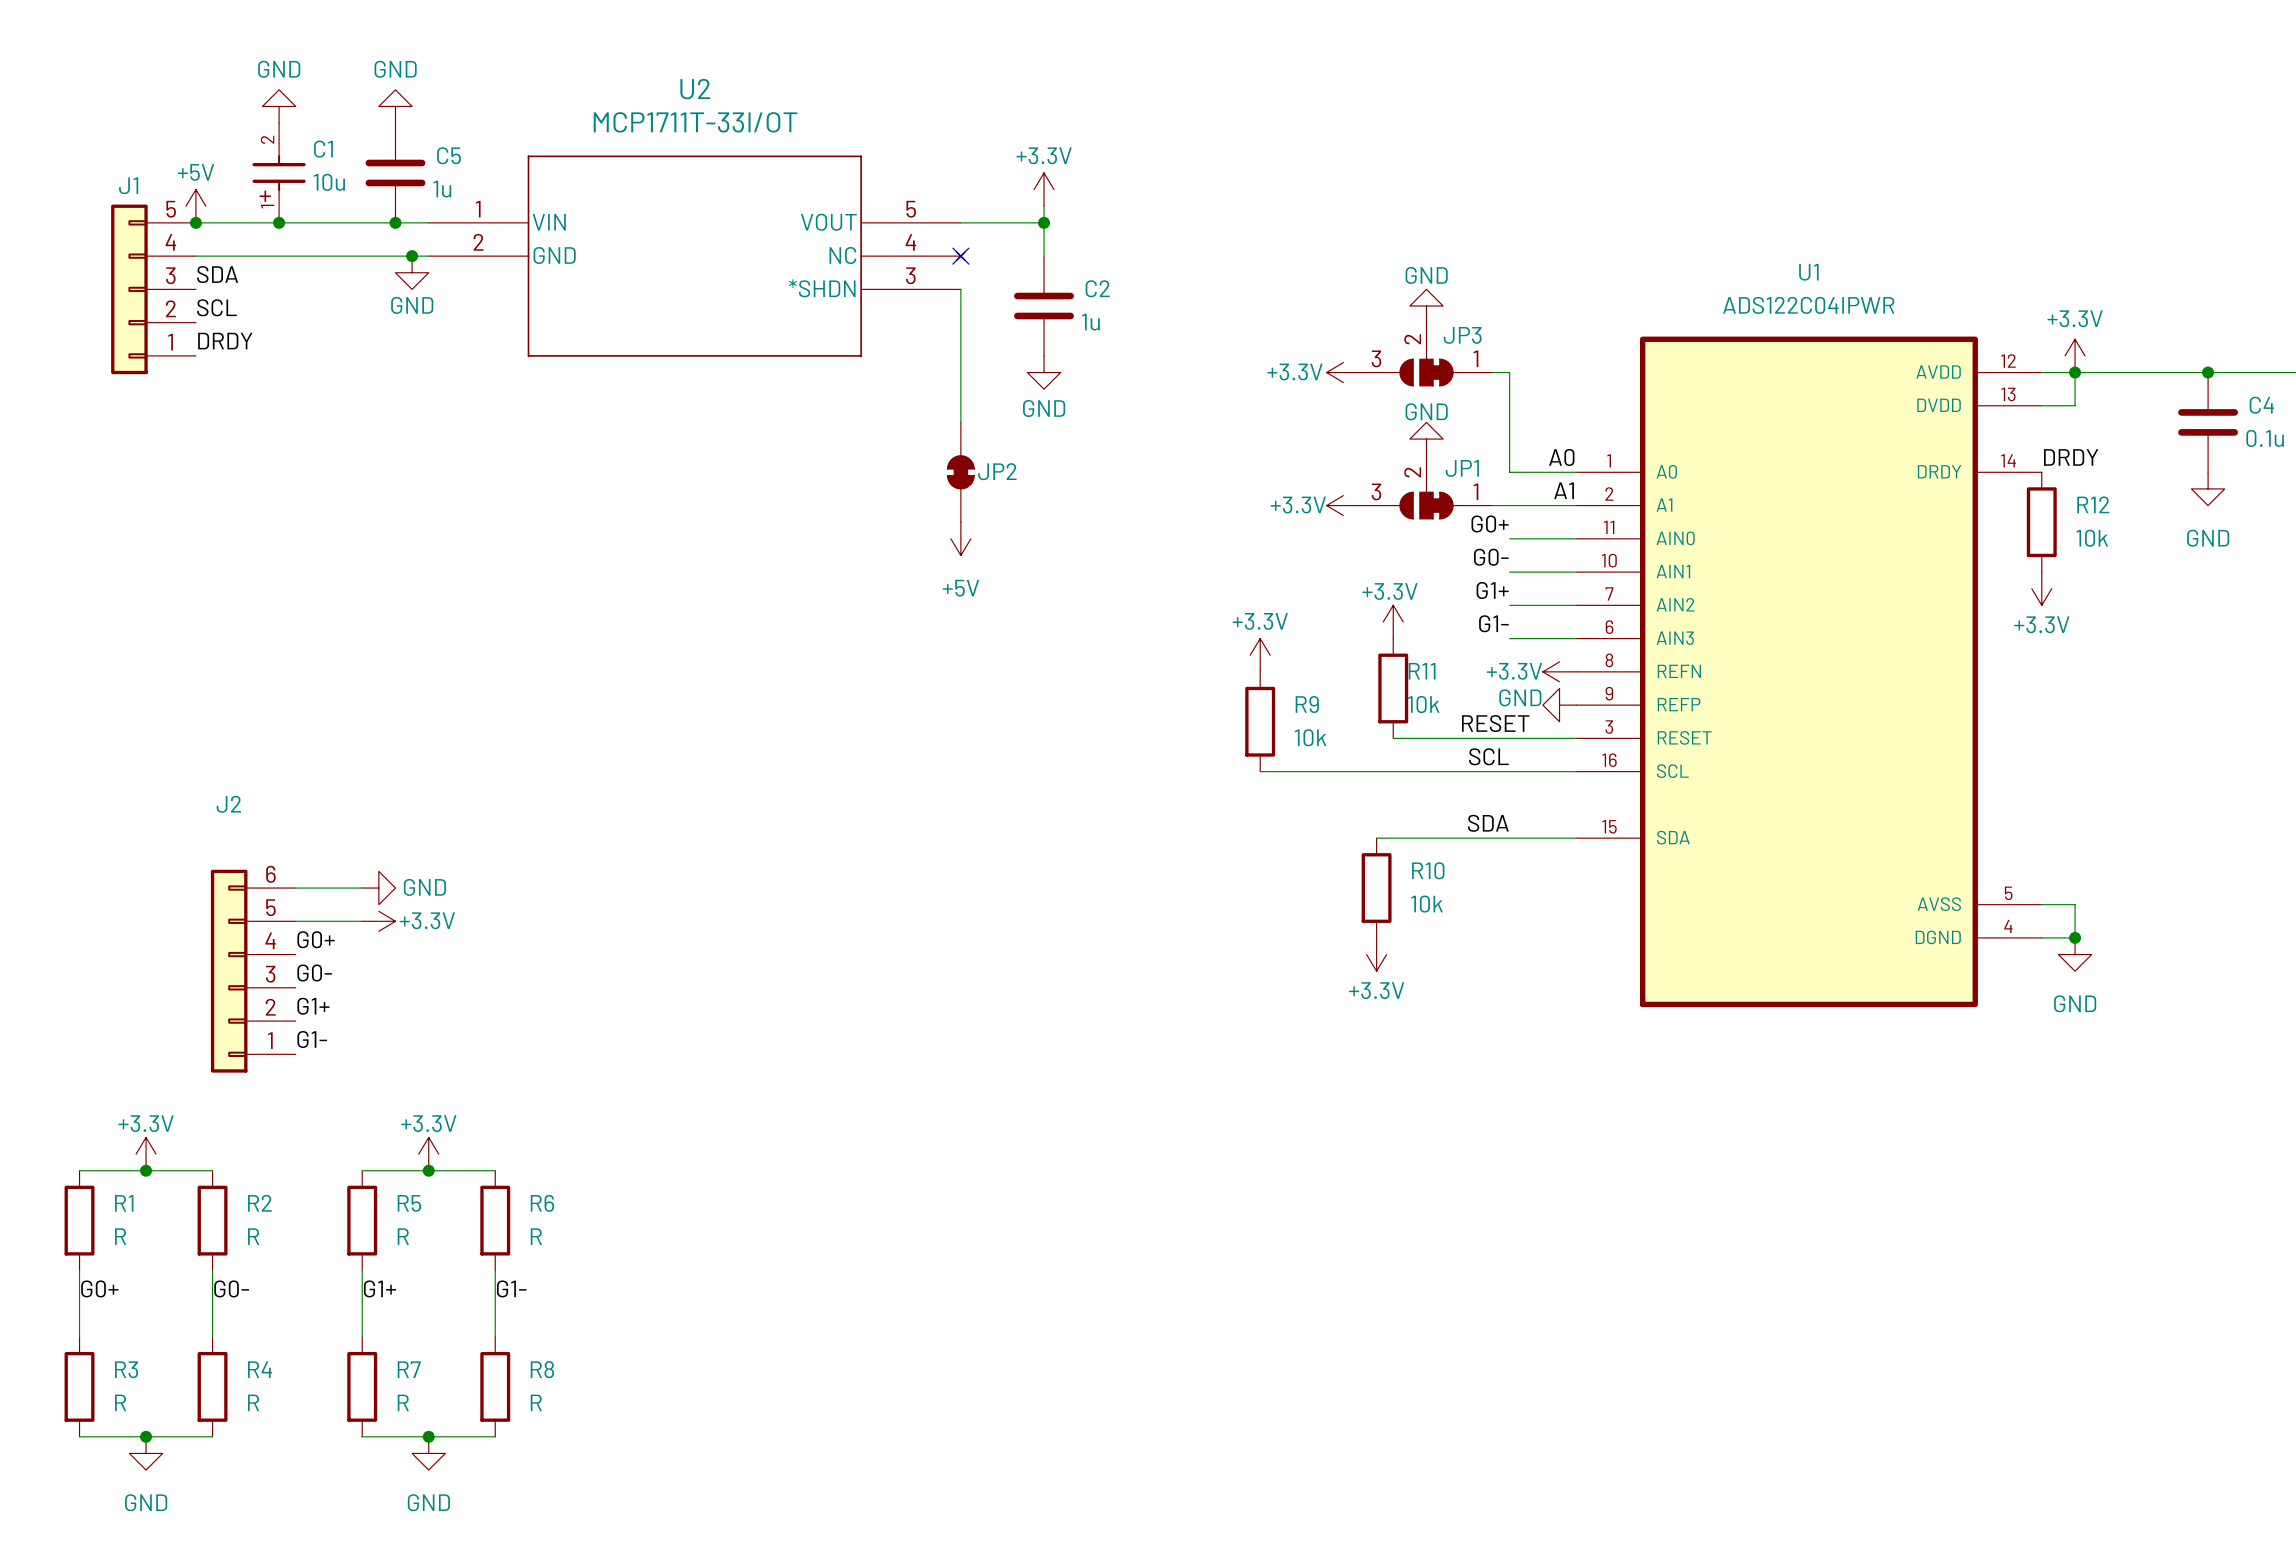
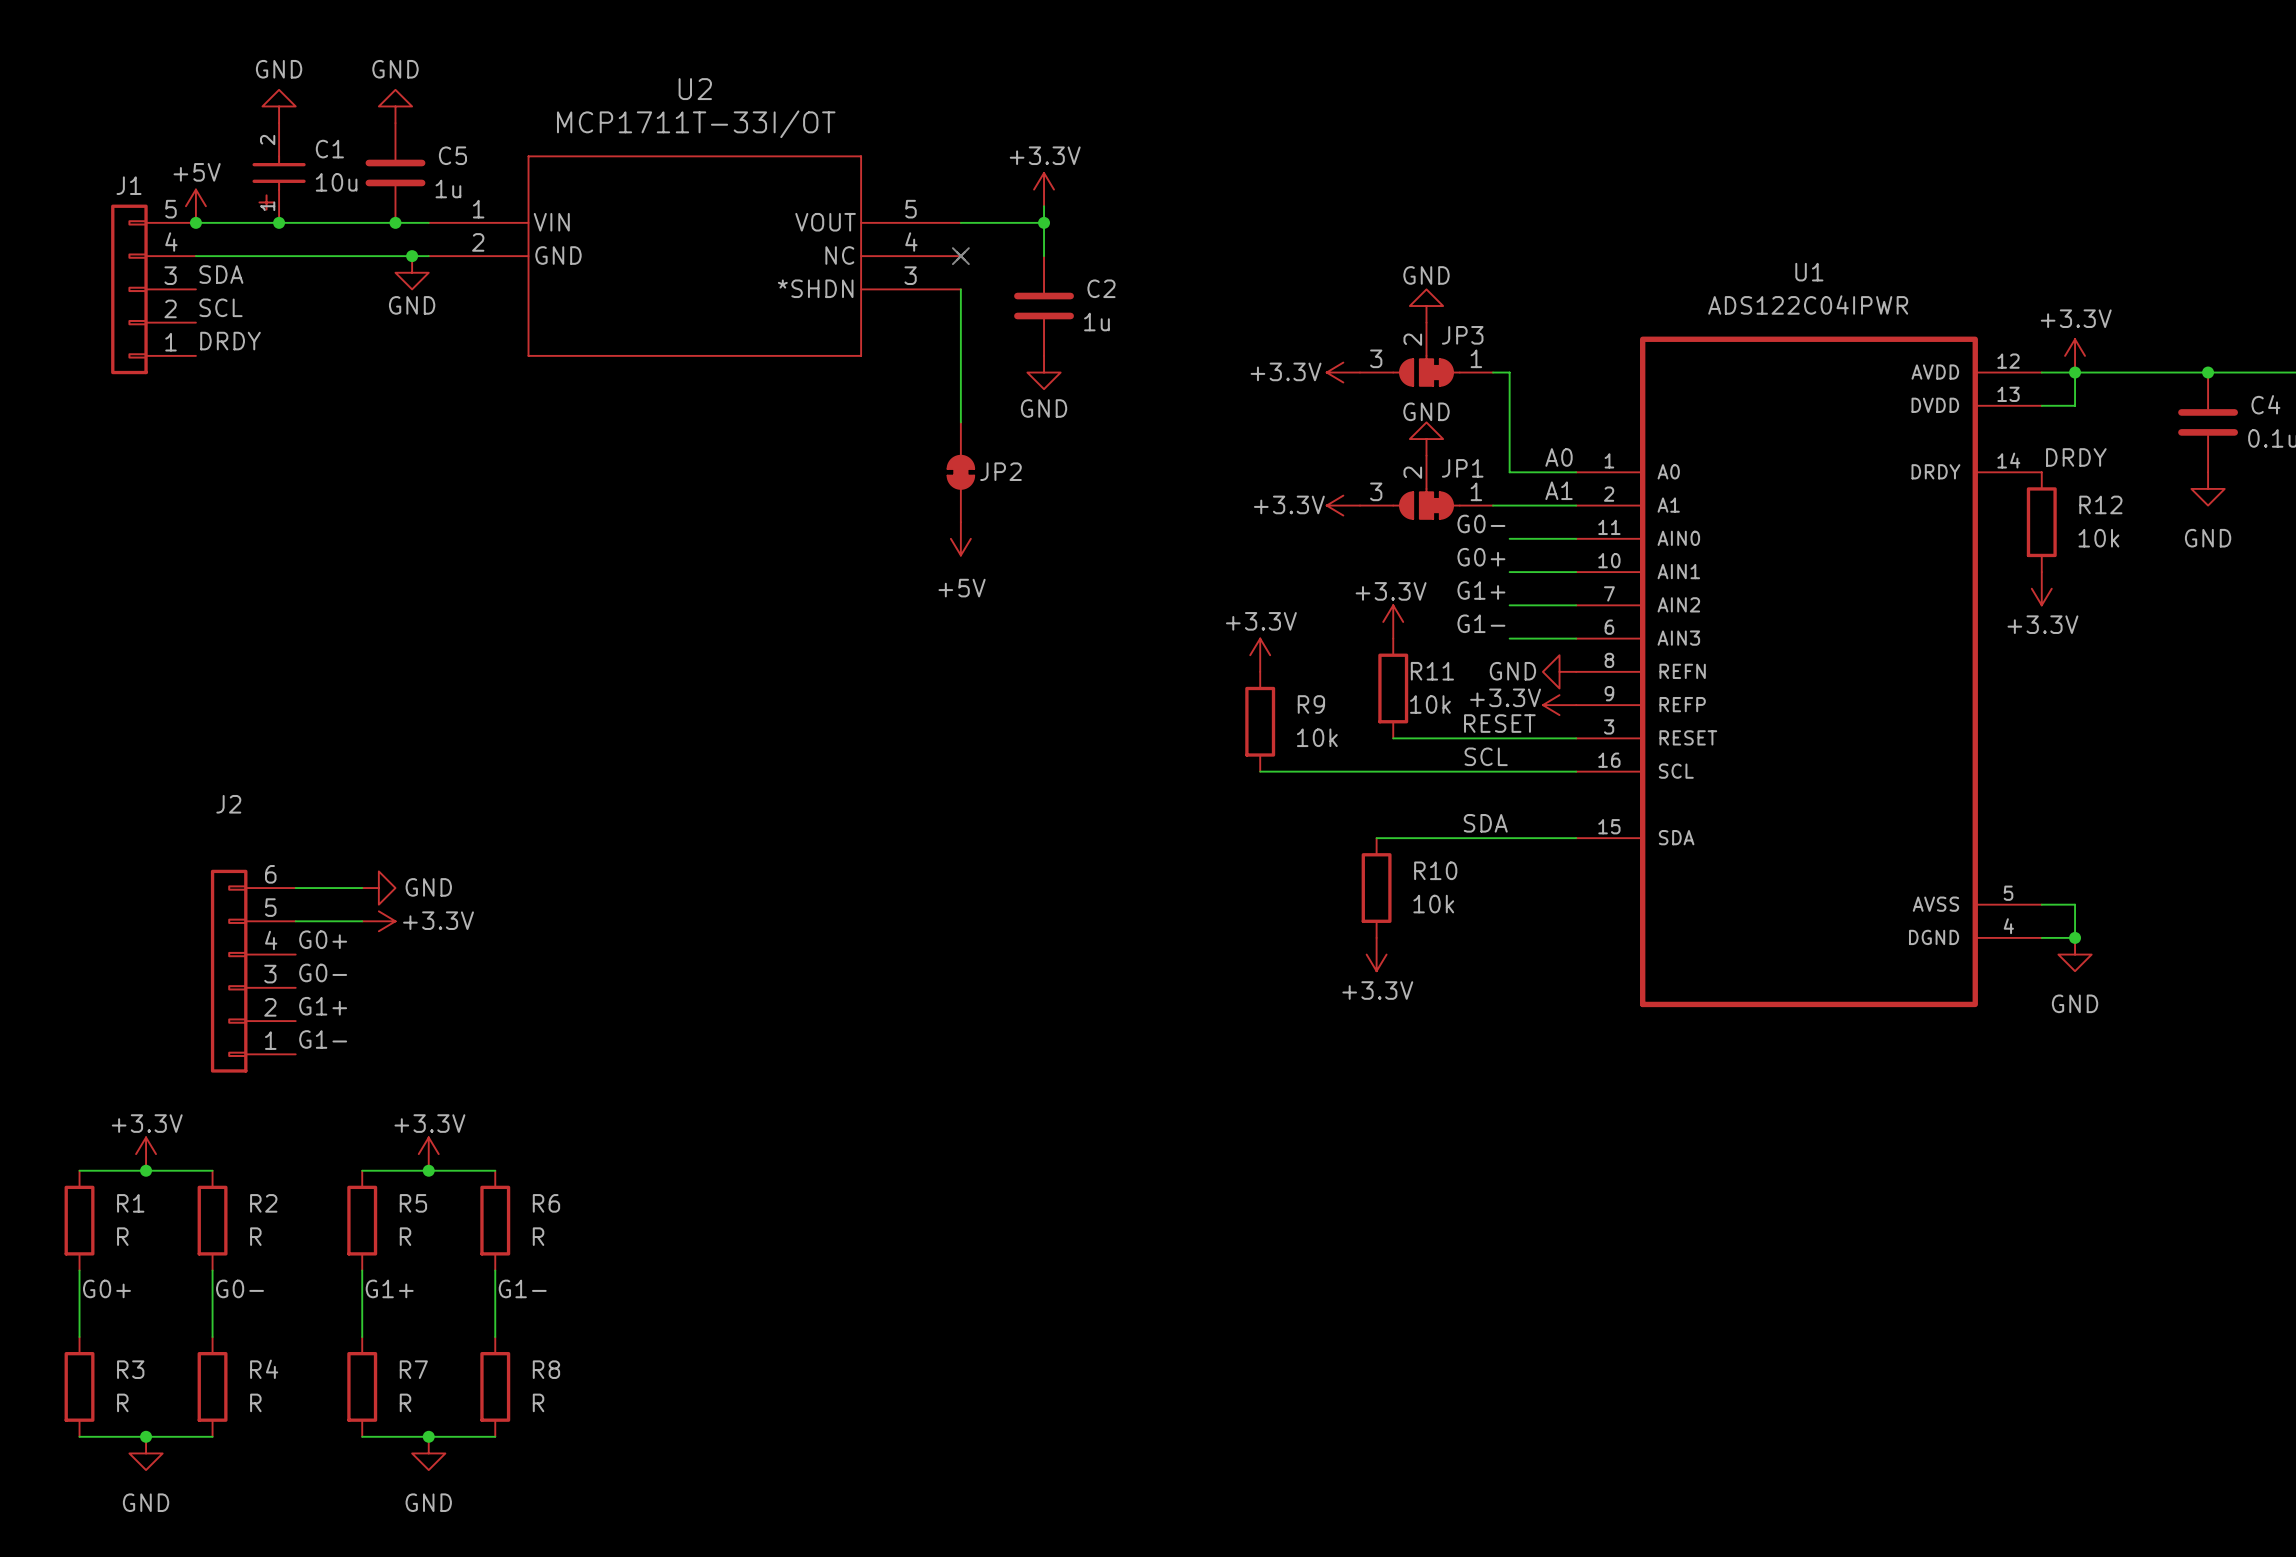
label: G0+ (1490, 524) -> G0- (1481, 523)
label: G0- (1491, 557) -> G0+ (1481, 557)
power symbol: +3.3V (1559, 671) -> GND (1559, 671)
power symbol: GND (1559, 705) -> +3.3V (1559, 705)

